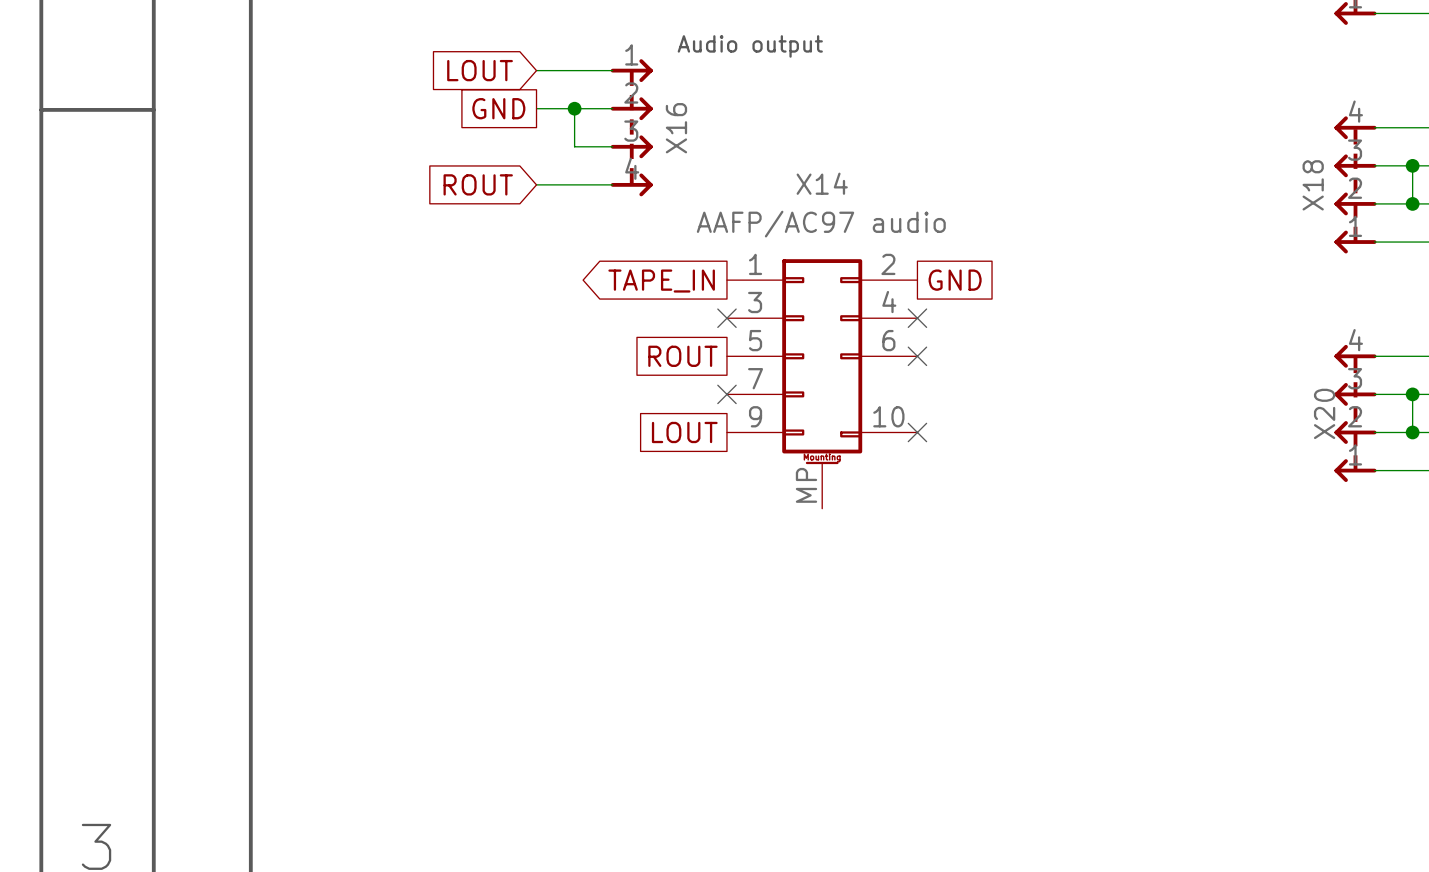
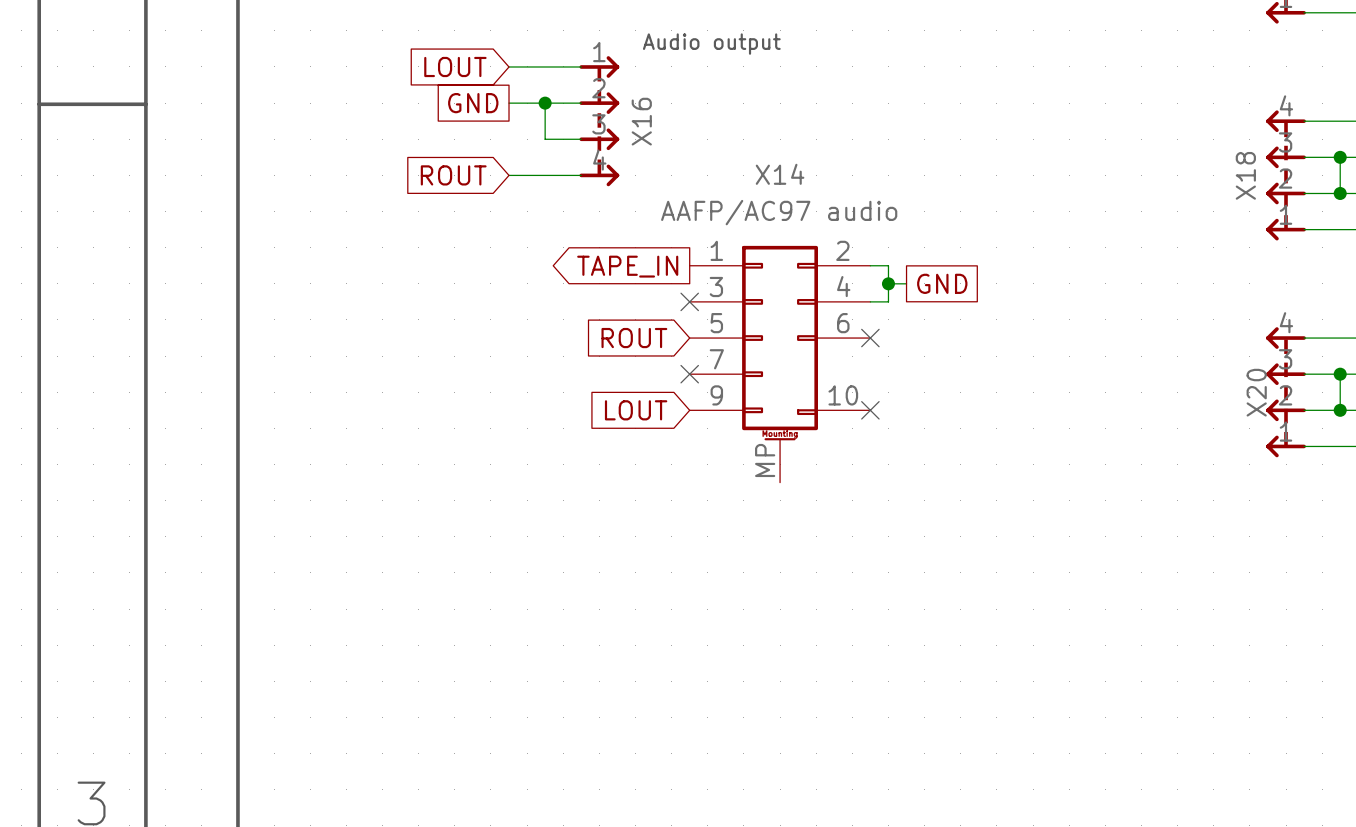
wire: none -> (870, 265) (888, 265) (888, 301) (870, 301)
global label position: GND (955, 280) -> GND (942, 283)
junction: none -> (888, 283)
no-connect mark: (917, 318) -> none
global label shape: passive (682, 356) -> input (634, 338)
global label shape: passive (684, 432) -> input (636, 410)

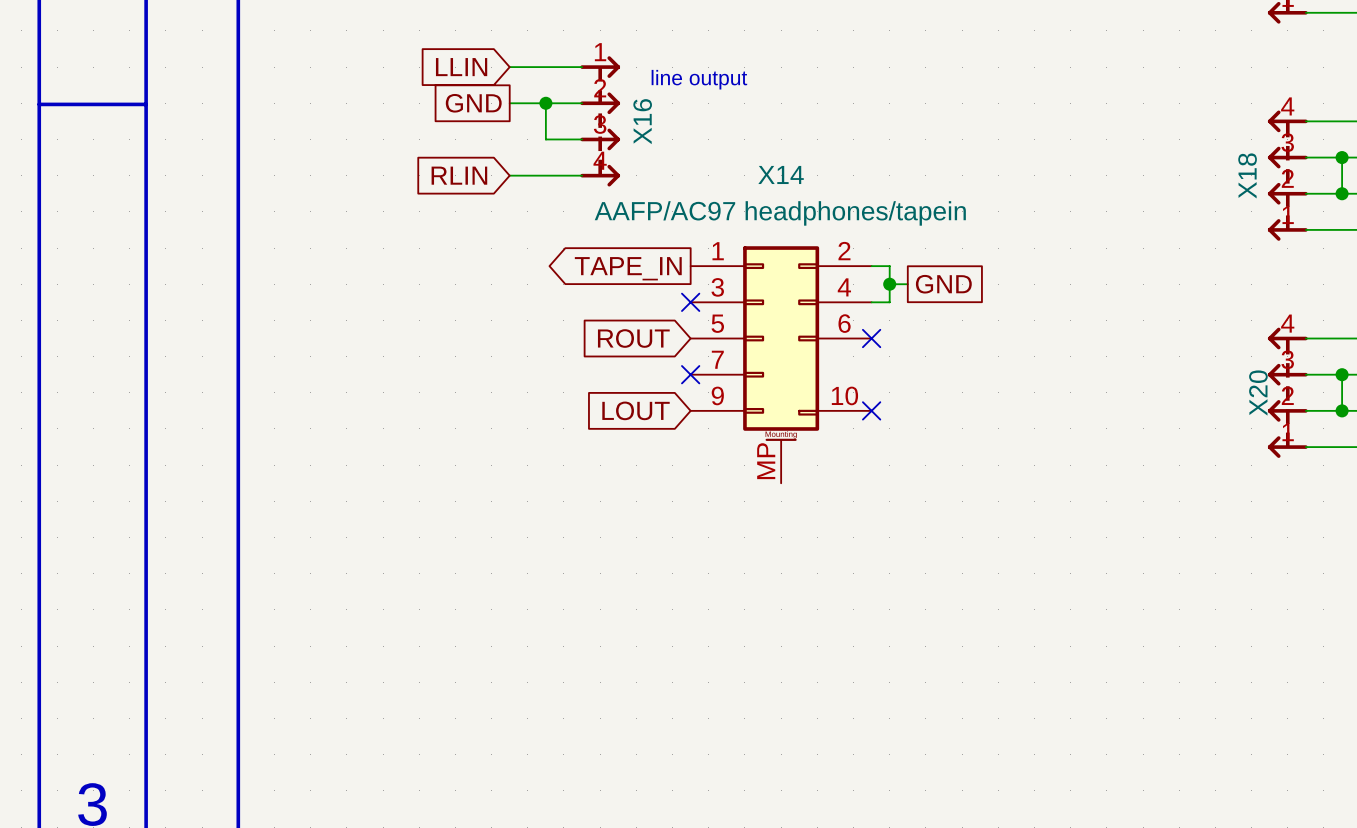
text: Audio output (711, 44) -> none
global label: LOUT (455, 66) -> LLIN (461, 67)
text: none -> line output (699, 79)
global label: ROUT (453, 175) -> RLIN (459, 175)
X14 value: AAFP/AC97 audio (779, 212) -> AAFP/AC97 headphones/tapein (780, 213)

